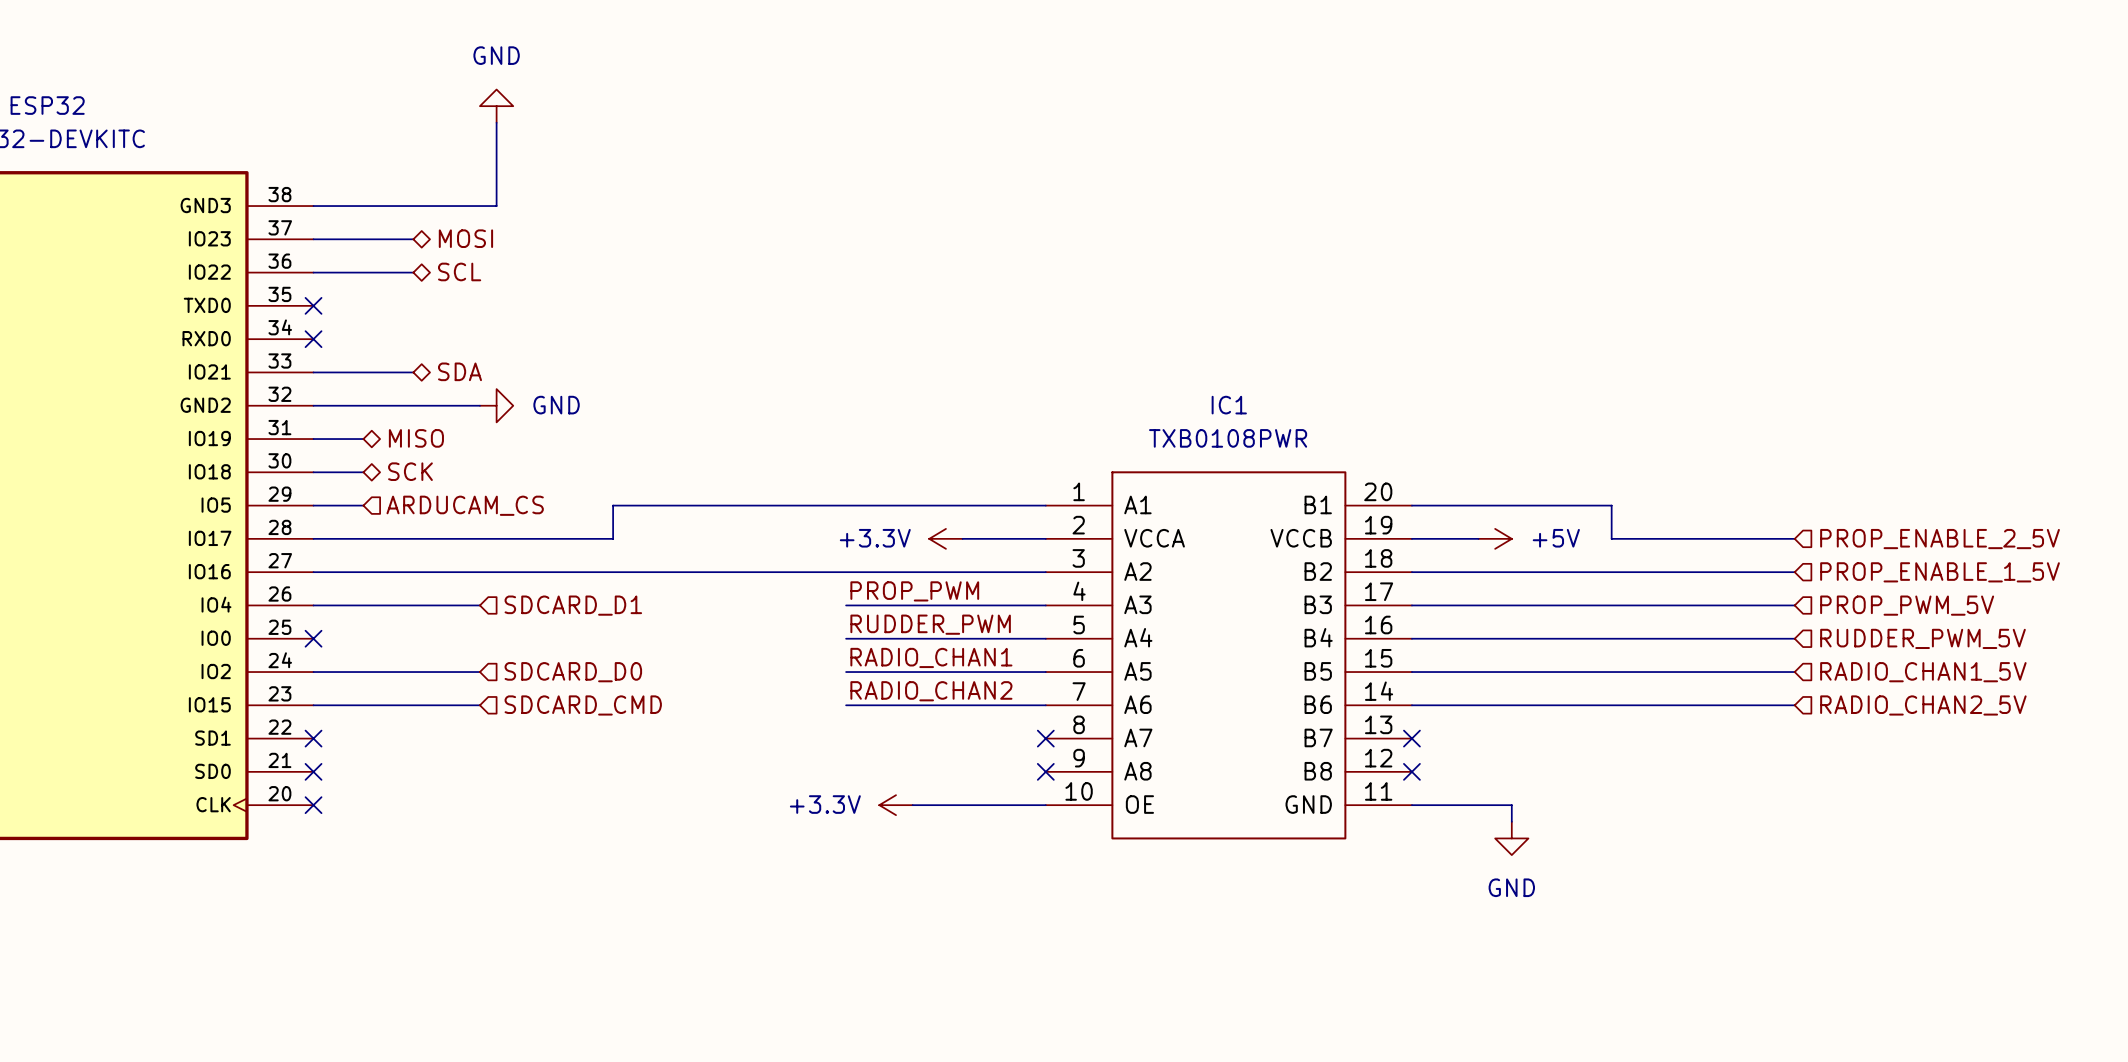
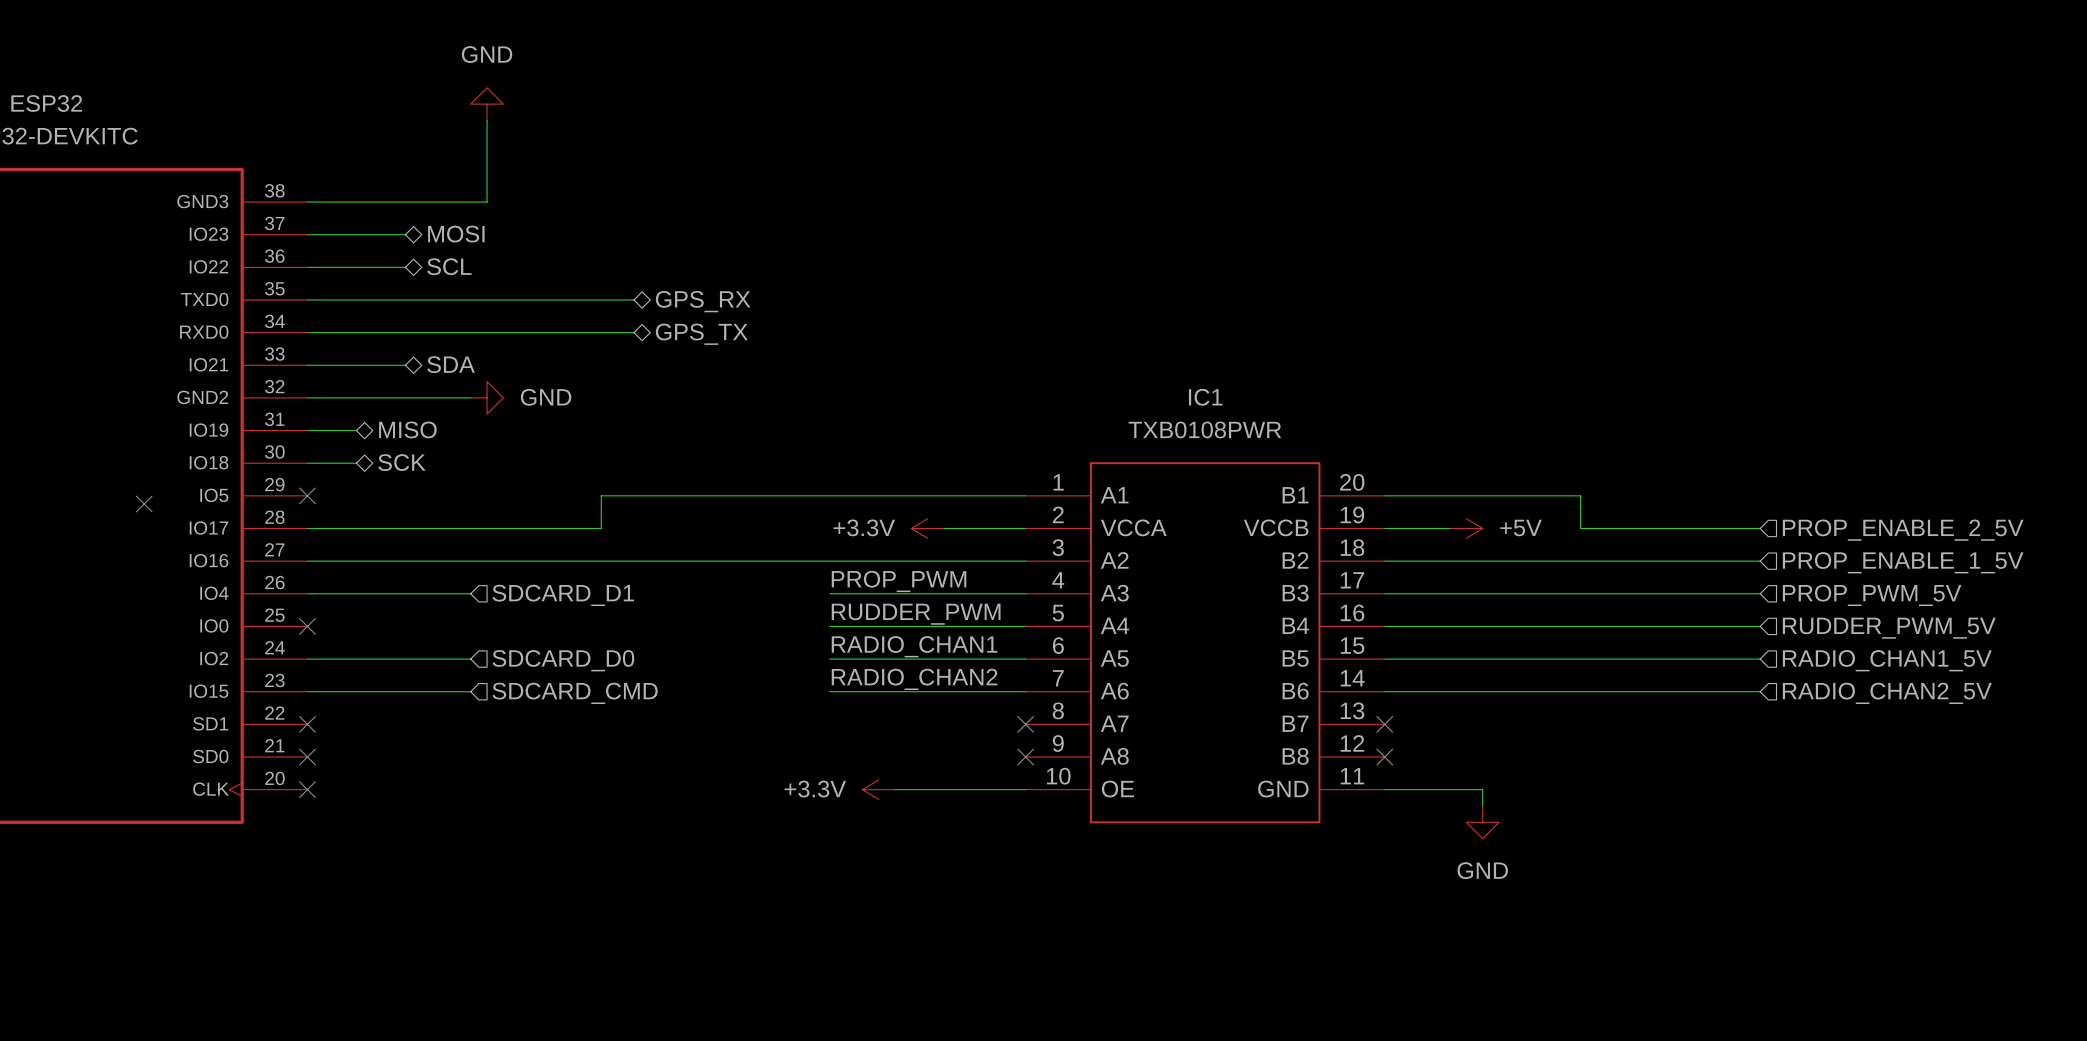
wire: none -> (307, 299) (633, 299)
no-connect mark: (313, 305) -> none
hierarchical label: none -> GPS_RX (703, 301)
wire: none -> (307, 332) (633, 332)
no-connect mark: (313, 339) -> none
hierarchical label: none -> GPS_TX (701, 334)
wire: (313, 505) (363, 505) -> none
no-connect mark: none -> (307, 495)
hierarchical label: ARDUCAM_CS (465, 505) -> none
no-connect mark: none -> (144, 504)

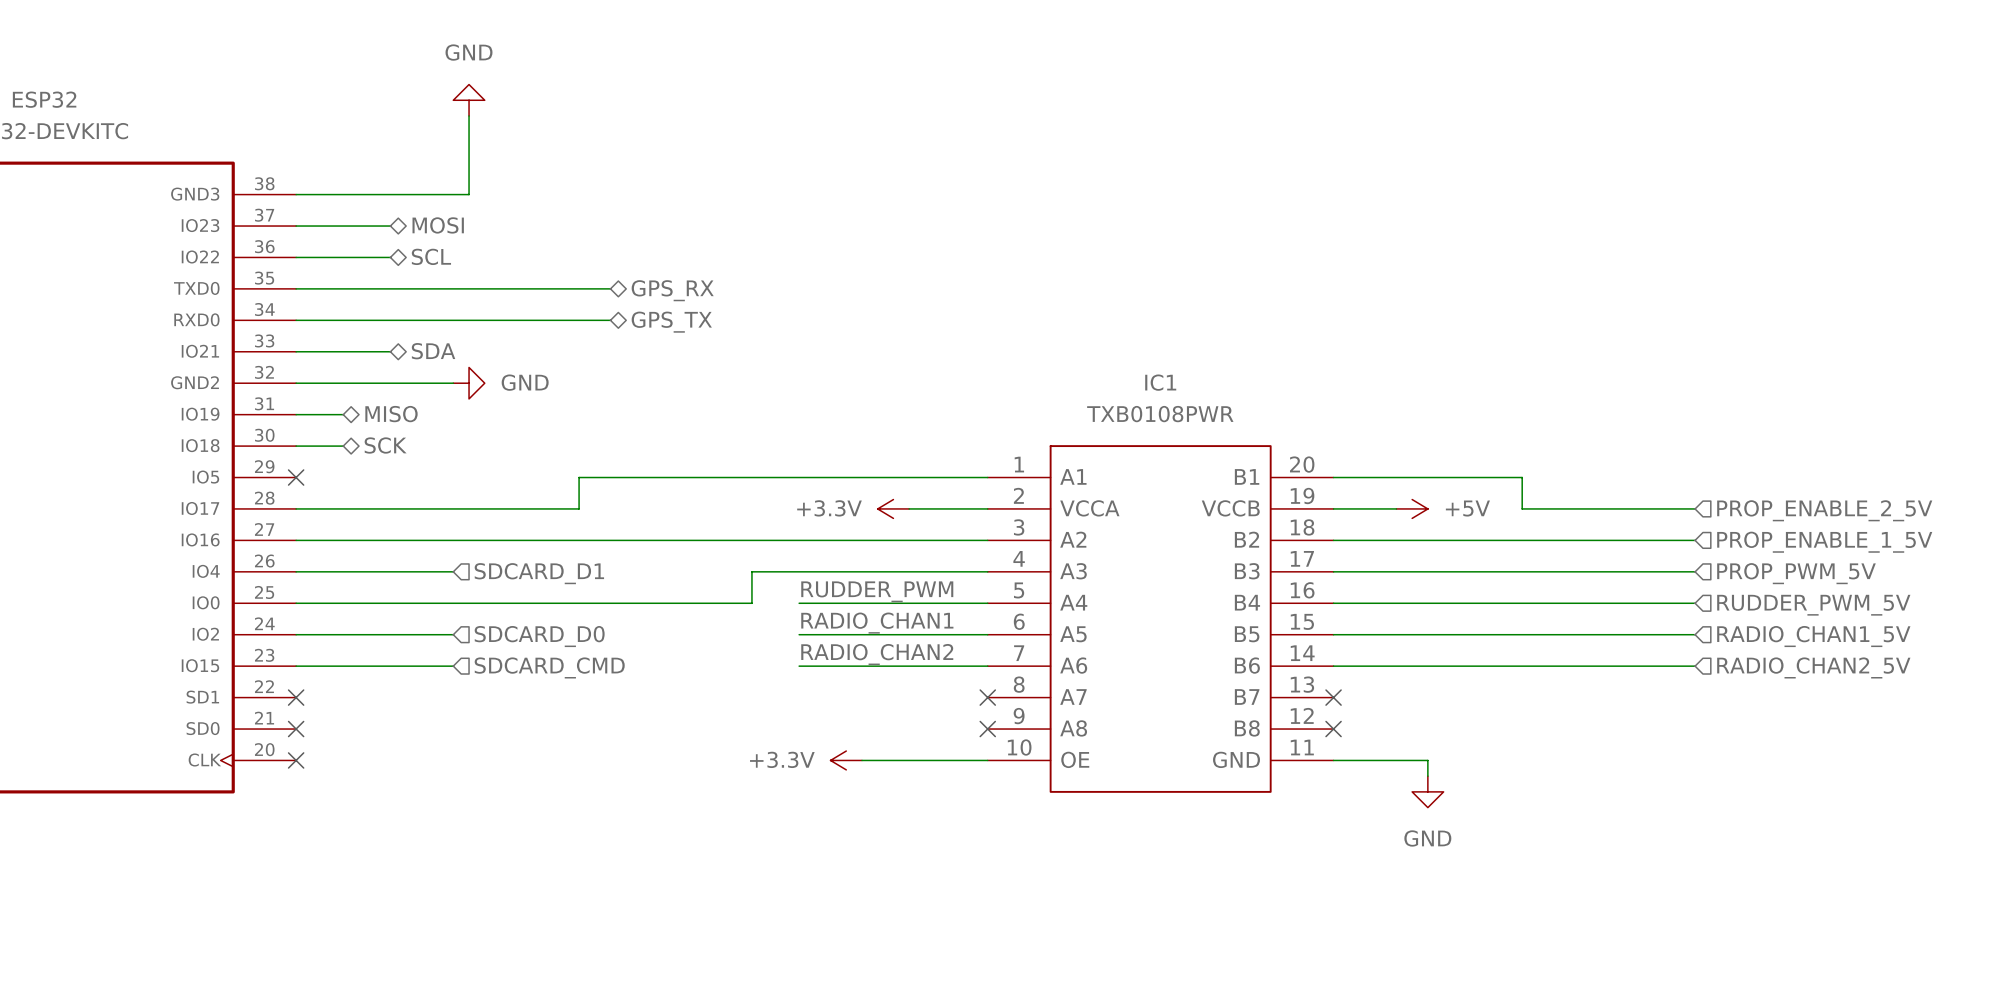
no-connect mark: (144, 504) -> none
label: PROP_PWM (899, 581) -> none
wire: none -> (799, 571) (751, 571) (751, 603) (296, 603)
no-connect mark: (307, 626) -> none

